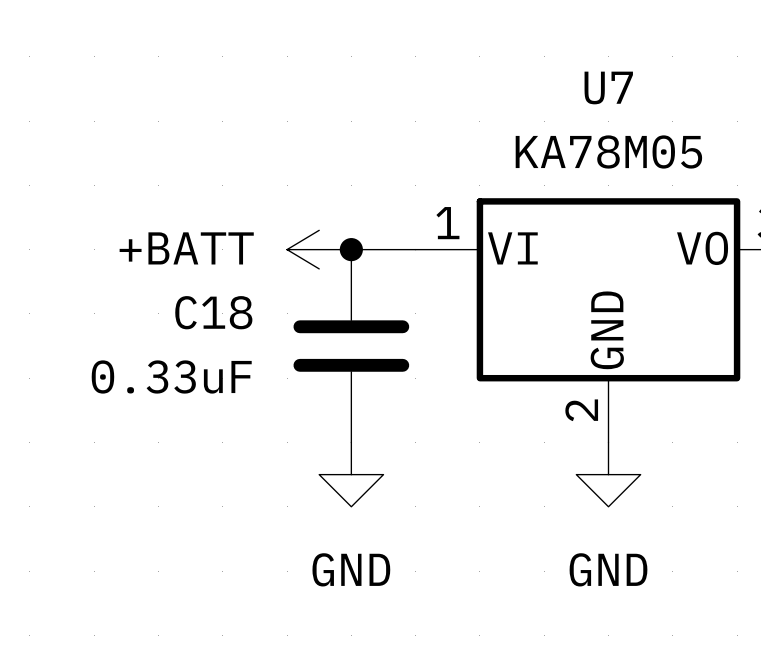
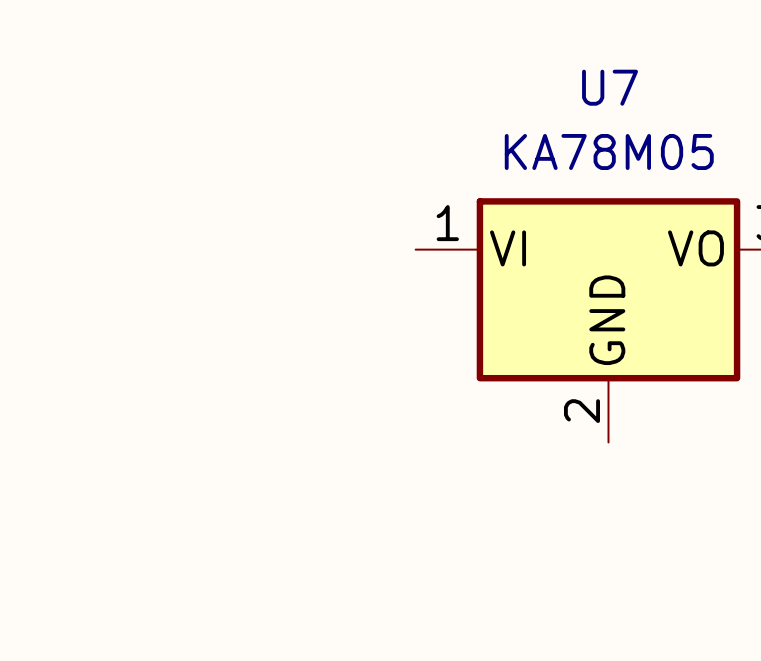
power symbol: +BATT (319, 249) -> none
wire: (351, 249) (415, 249) -> none
junction: (351, 249) -> none
C18: 0.33uF (351, 346) -> none
power symbol: GND (351, 474) -> none
power symbol: GND (608, 474) -> none

